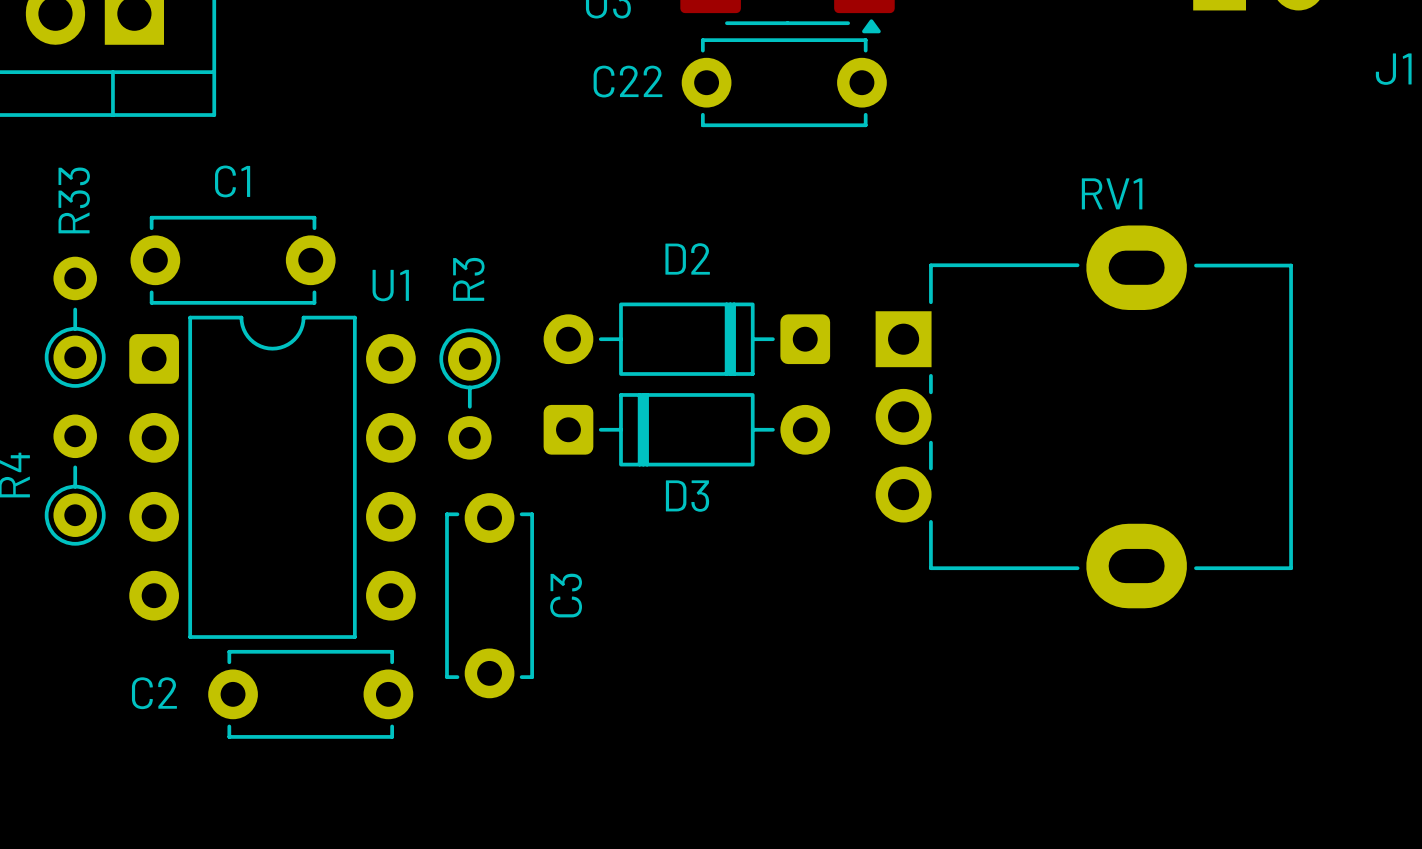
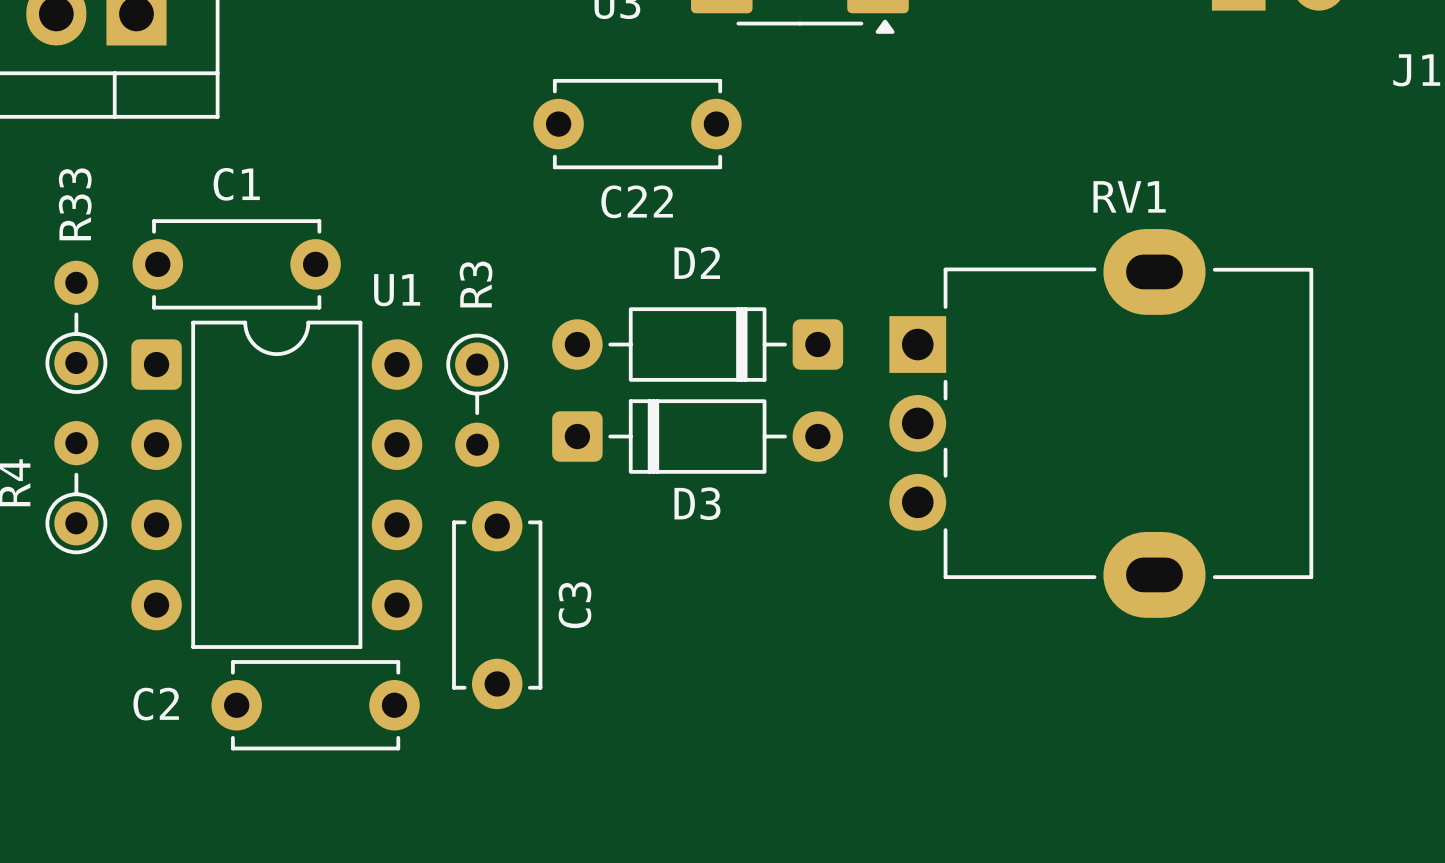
C22 name position: C22 (627, 81) -> C22 (637, 201)
C22 position: (784, 82) -> (637, 124)

